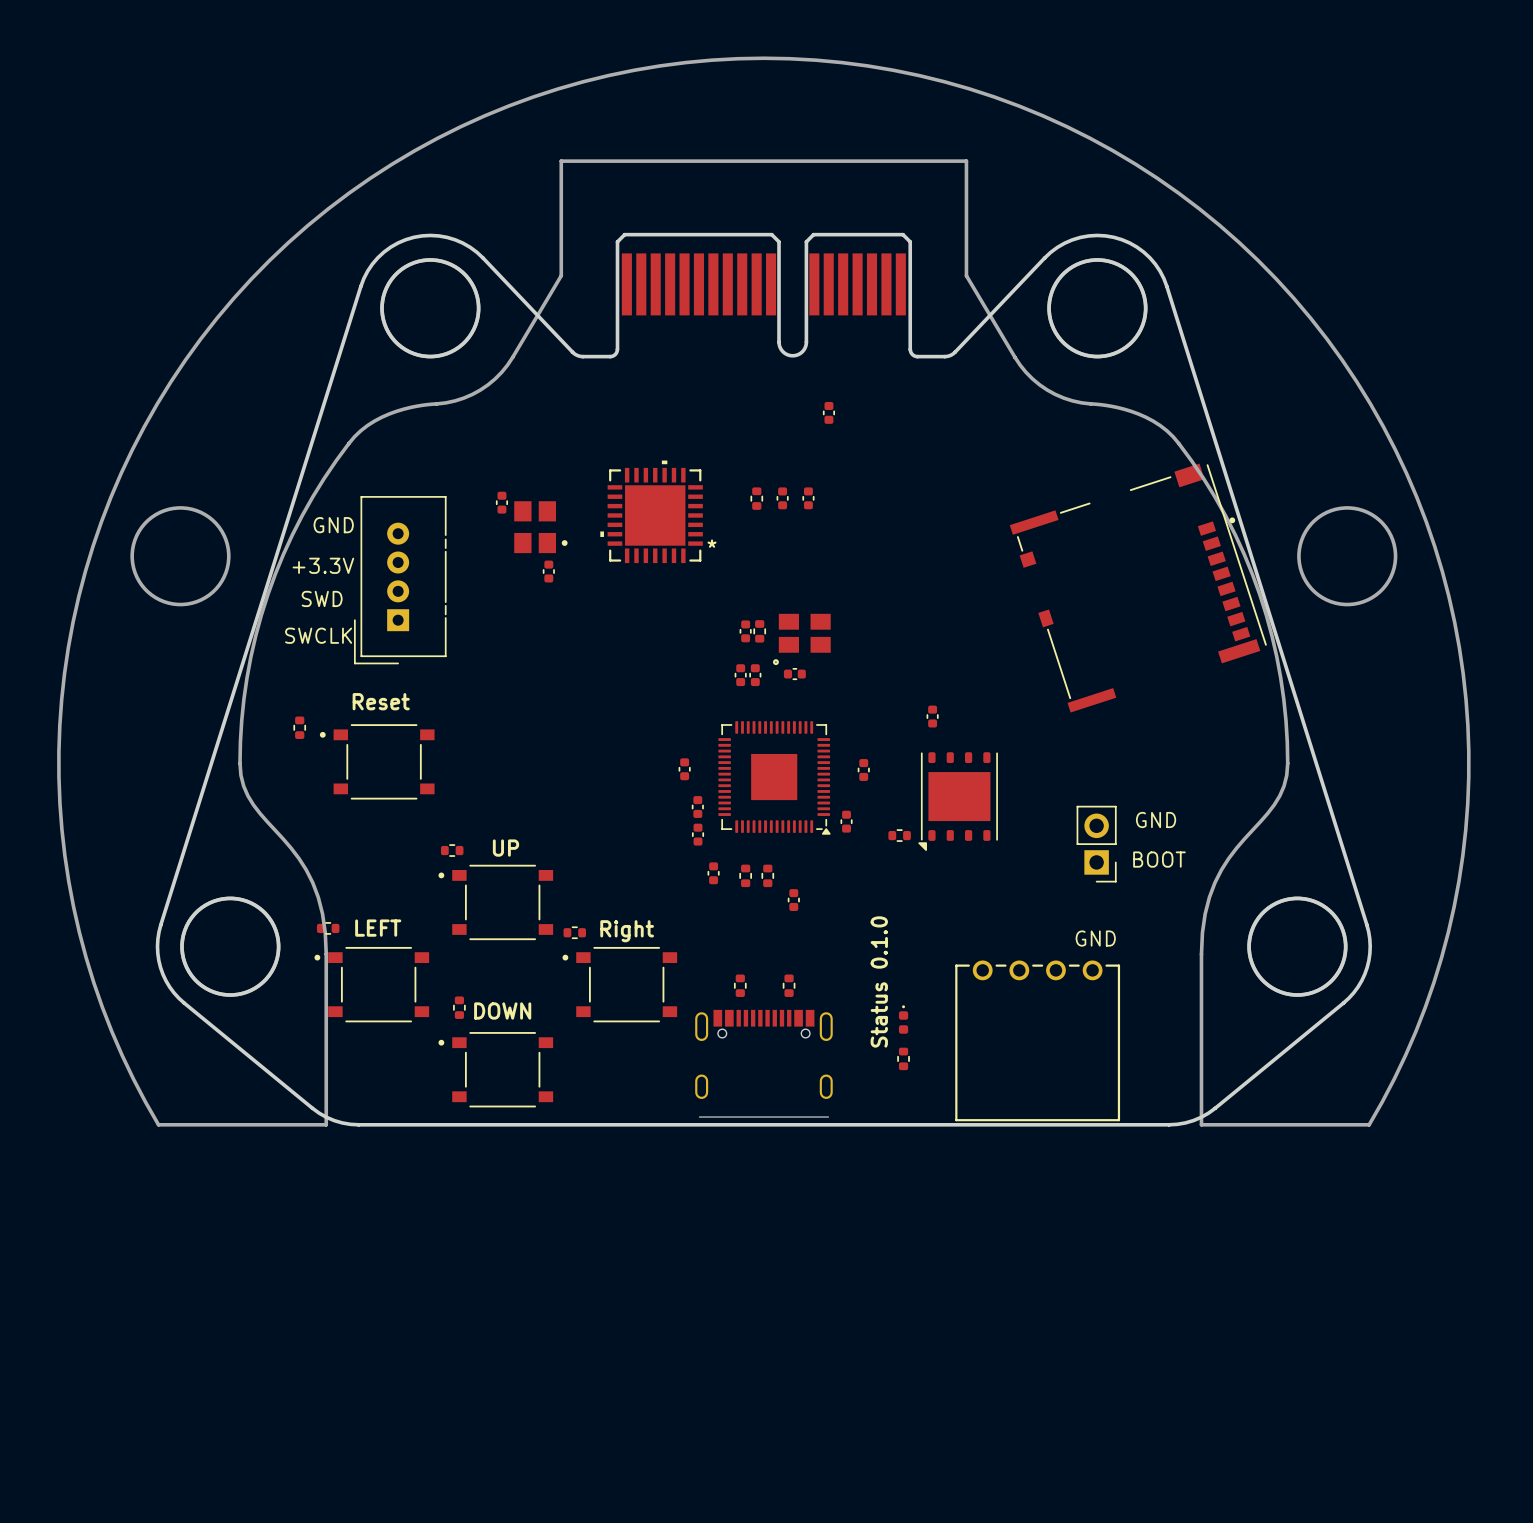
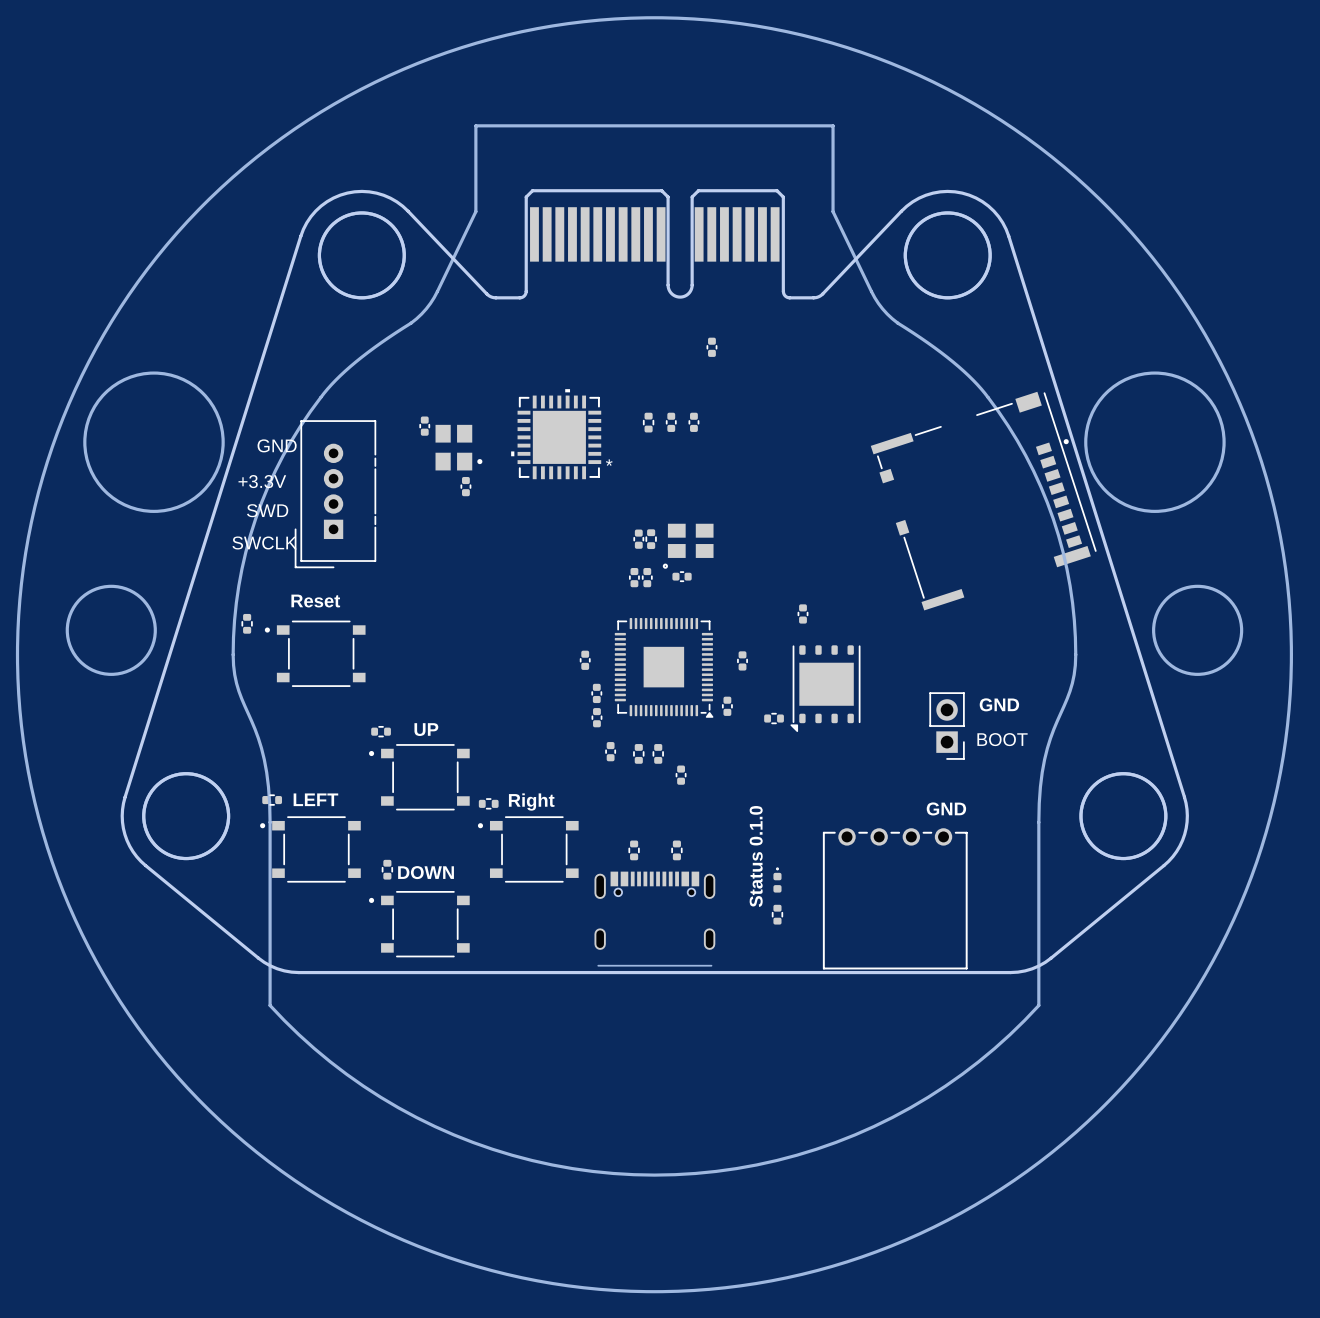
drawing: none -> [15, 16, 1293, 1294]
line: (561, 161) (966, 161) (966, 275) (1014, 357) (1032, 378) (1055, 394) (1072, 400) (1111, 406) (1131, 411) (1153, 421) (1173, 436) (1203, 478) (1235, 534) (1259, 594) (1271, 635) (1283, 698) (1287, 741) (1286, 775) (1284, 786) (1274, 804) (1236, 848) (1221, 869) (1209, 897) (1205, 913) (1201, 954) (1201, 1124) (1369, 1124) (1394, 1079) (1415, 1031) (1441, 957) (1458, 881) (1465, 829) (1468, 777) (1466, 699) (1459, 647) (1448, 596) (1426, 521) (1406, 473) (1383, 426) (1356, 381) (1326, 339) (1276, 279) (1239, 242) (1199, 208) (1157, 178) (1112, 150) (1042, 115) (994, 96) (944, 81) (867, 65) (815, 60) (763, 58) (685, 62) (634, 70) (583, 81) (533, 96) (484, 115) (414, 150) (370, 178) (328, 208) (269, 260) (233, 298) (200, 339) (157, 404) (121, 473) (101, 521) (85, 571) (73, 622) (64, 673) (59, 725) (58, 777) (61, 829) (68, 881) (86, 957) (102, 1007) (122, 1055) (158, 1124) (326, 1124) (326, 954) (322, 913) (318, 897) (306, 869) (291, 848) (253, 804) (243, 786) (240, 775) (240, 741) (243, 698) (255, 635) (275, 574) (292, 534) (324, 478) (354, 436) (374, 421) (396, 411) (416, 406) (455, 400) (472, 394) (495, 378) (512, 357) (561, 275) (561, 161) -> (475, 125) (475, 211) (434, 297) (416, 318) (355, 361) (335, 380) (320, 397) (300, 425) (275, 470) (261, 502) (245, 552) (236, 603) (233, 665) (238, 691) (261, 748) (268, 786) (270, 1005) (314, 1048) (346, 1074) (380, 1097) (416, 1117) (453, 1134) (492, 1149) (532, 1160) (572, 1168) (613, 1173) (675, 1174) (716, 1171) (756, 1164) (816, 1149) (873, 1126) (928, 1097) (978, 1061) (1009, 1034) (1038, 1005) (1040, 786) (1047, 748) (1072, 683) (1075, 654) (1070, 585) (1053, 518) (1025, 455) (1008, 425) (984, 393) (947, 357) (892, 318) (874, 297) (833, 211) (833, 125) (475, 125)
drawing: [130, 506, 231, 607] -> none
drawing: [1297, 506, 1398, 607] -> none

